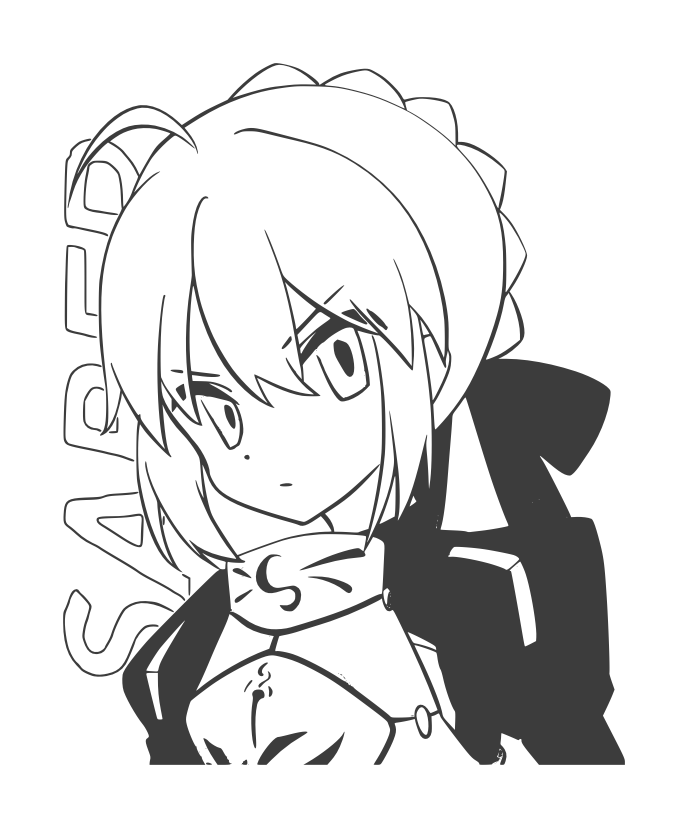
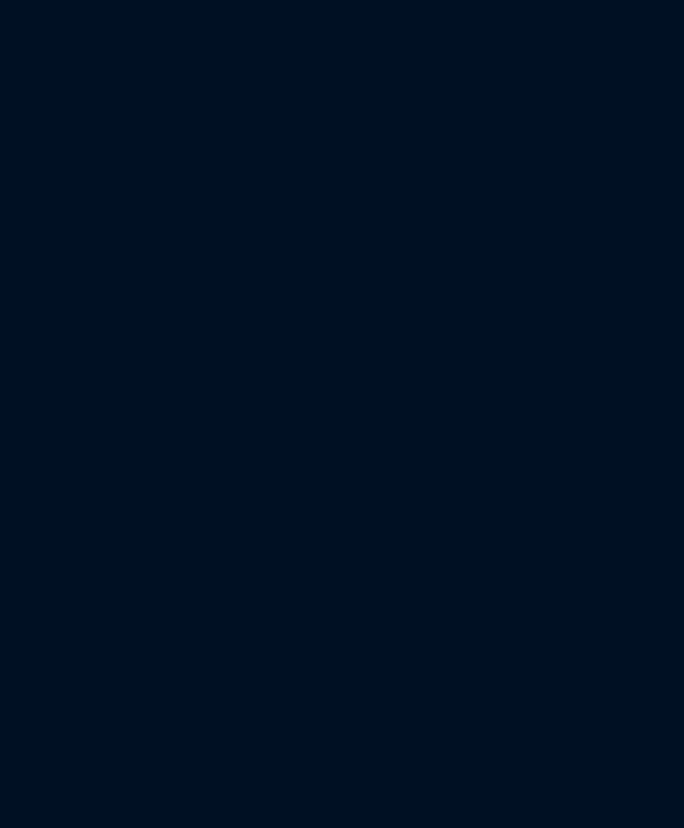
drawing: [63, 63, 625, 765] -> none

